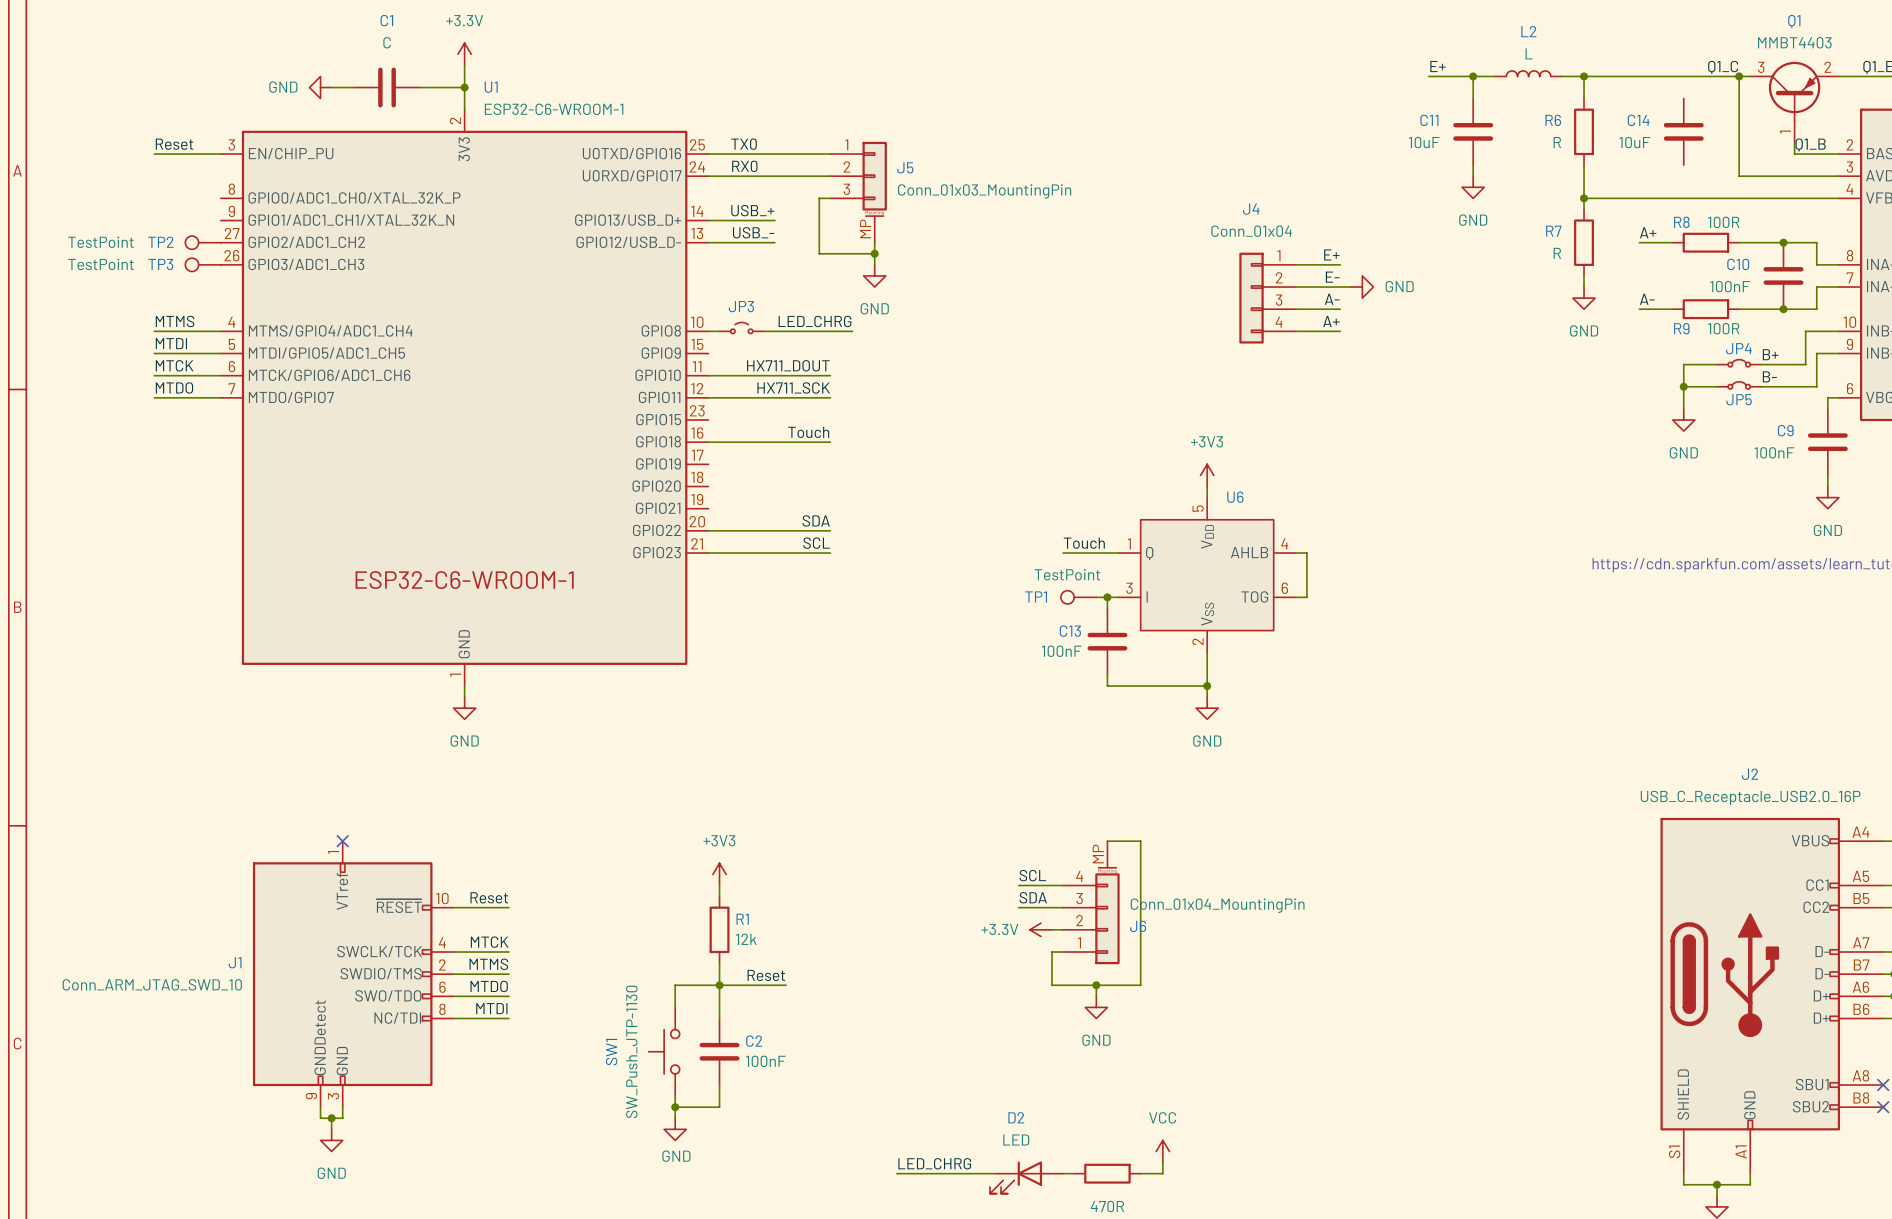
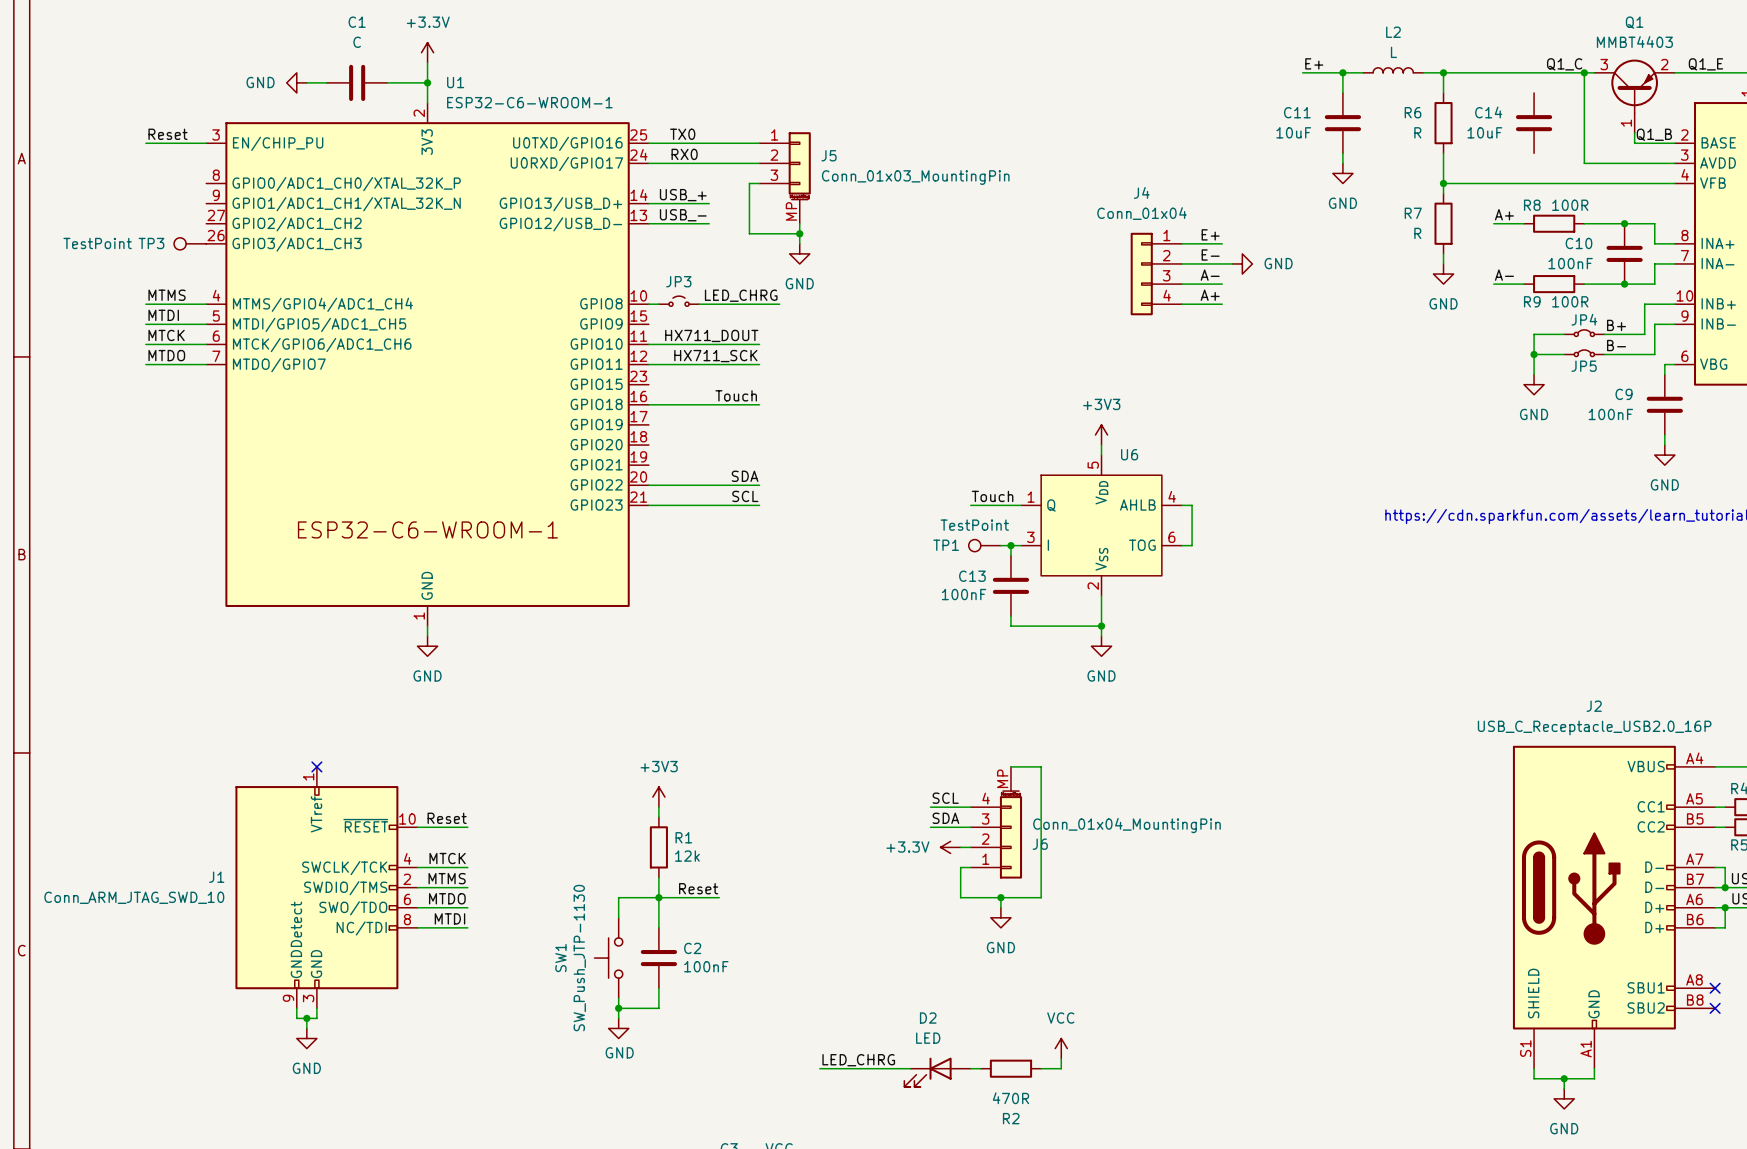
TP2: TestPoint (203, 242) -> none

